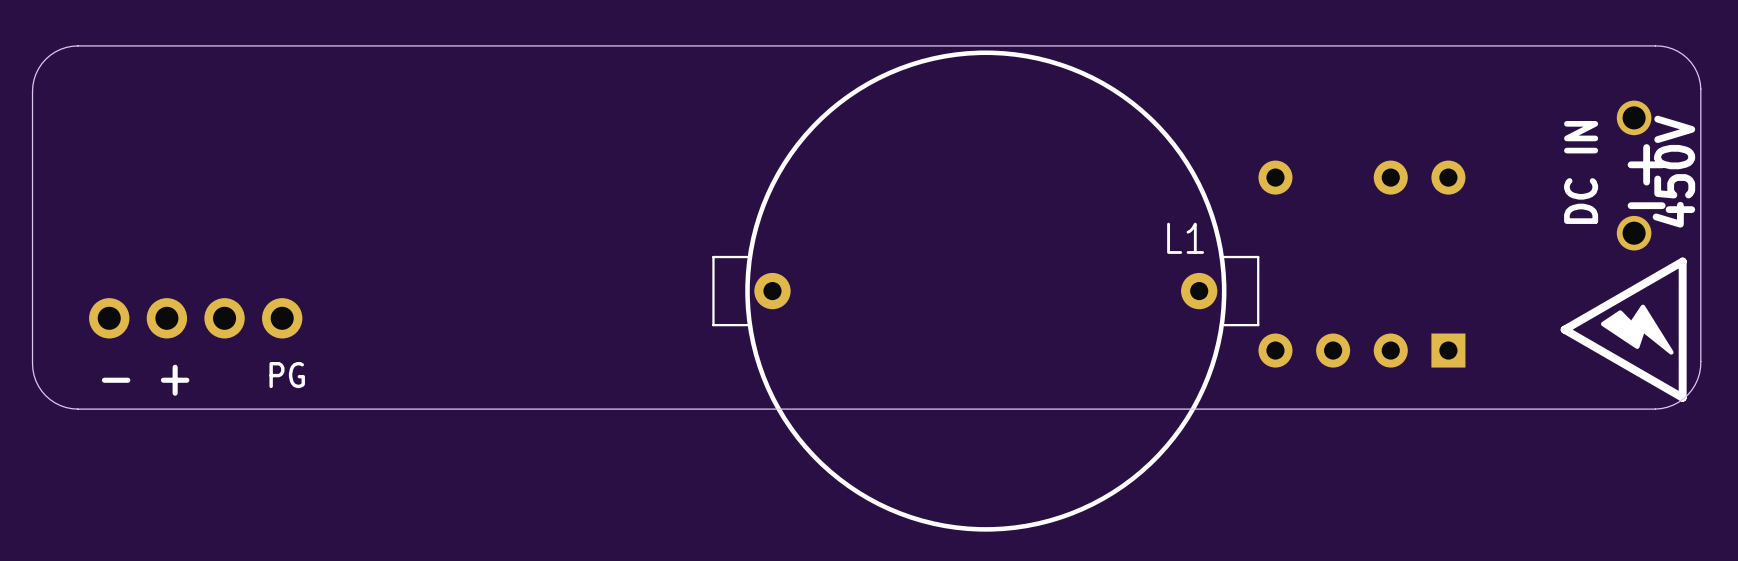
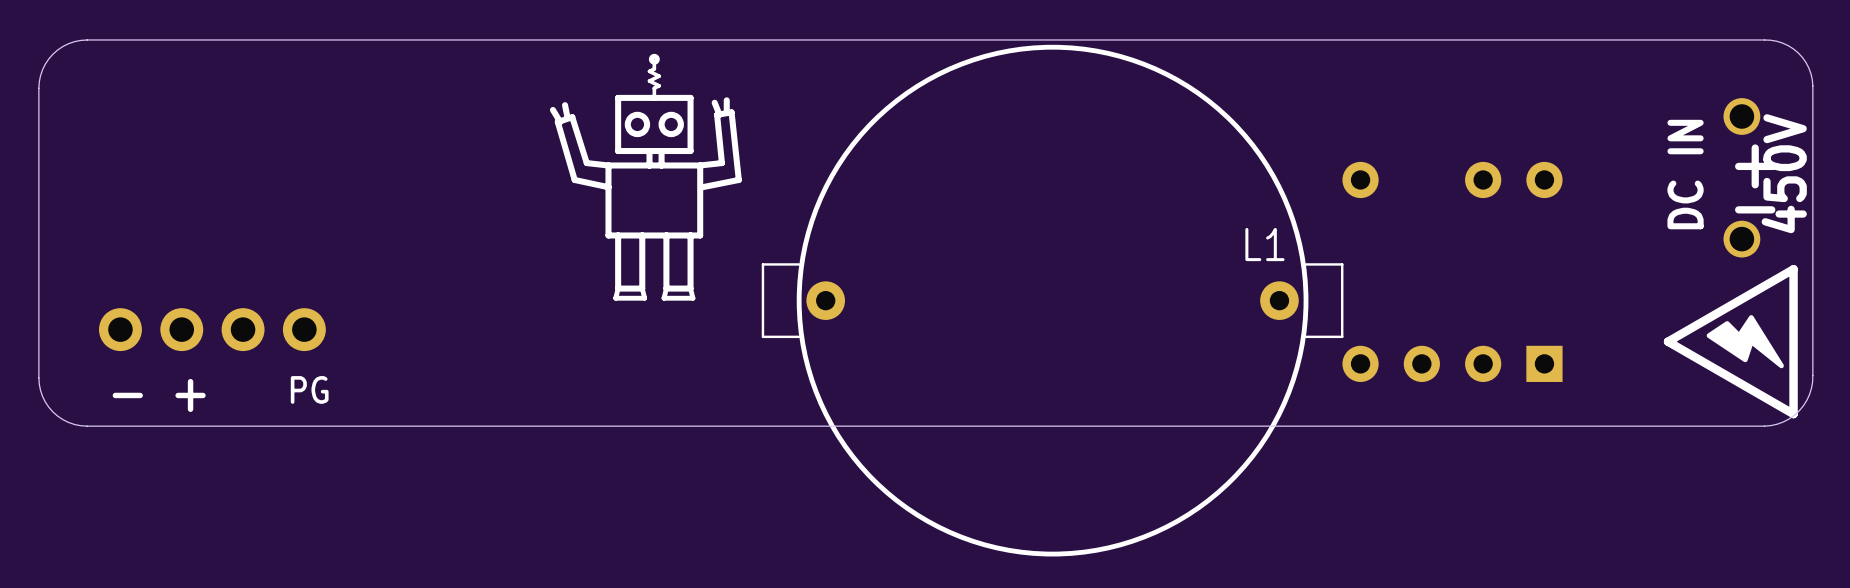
drawing: none -> [549, 53, 742, 301]

